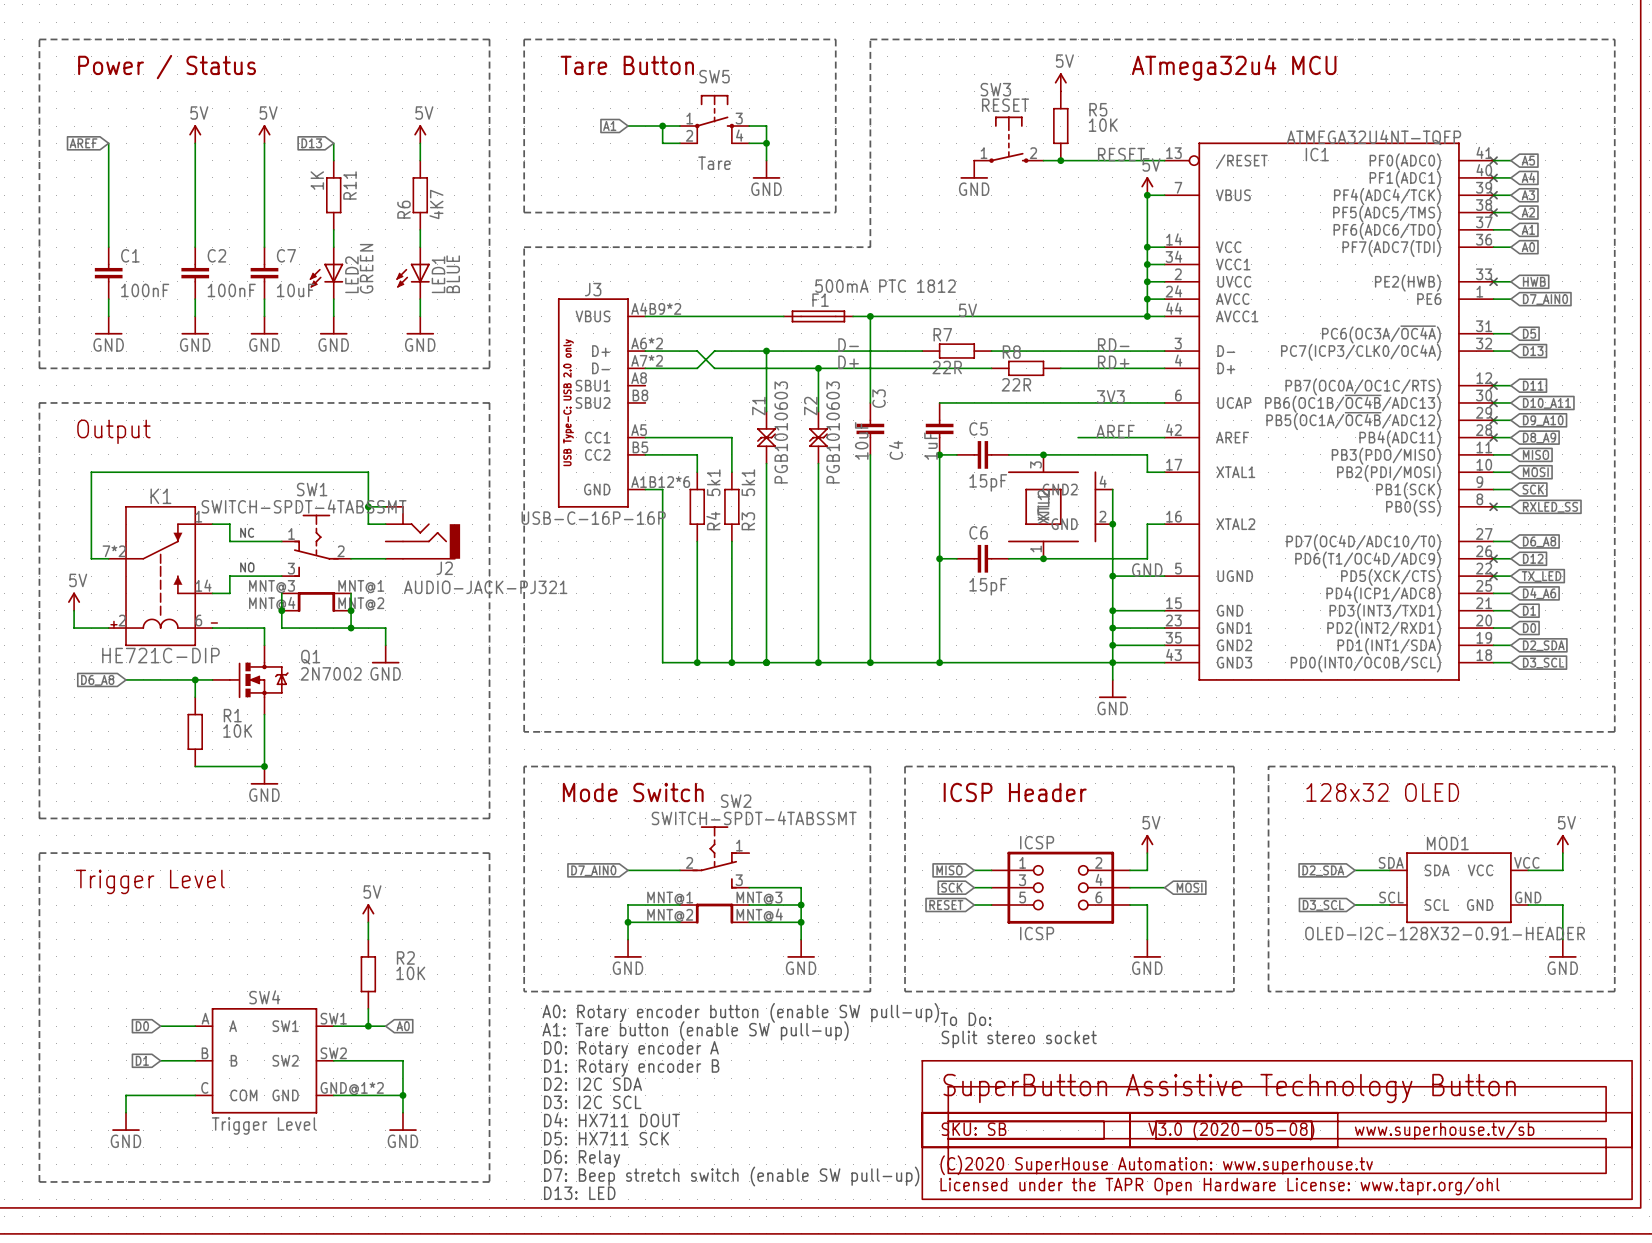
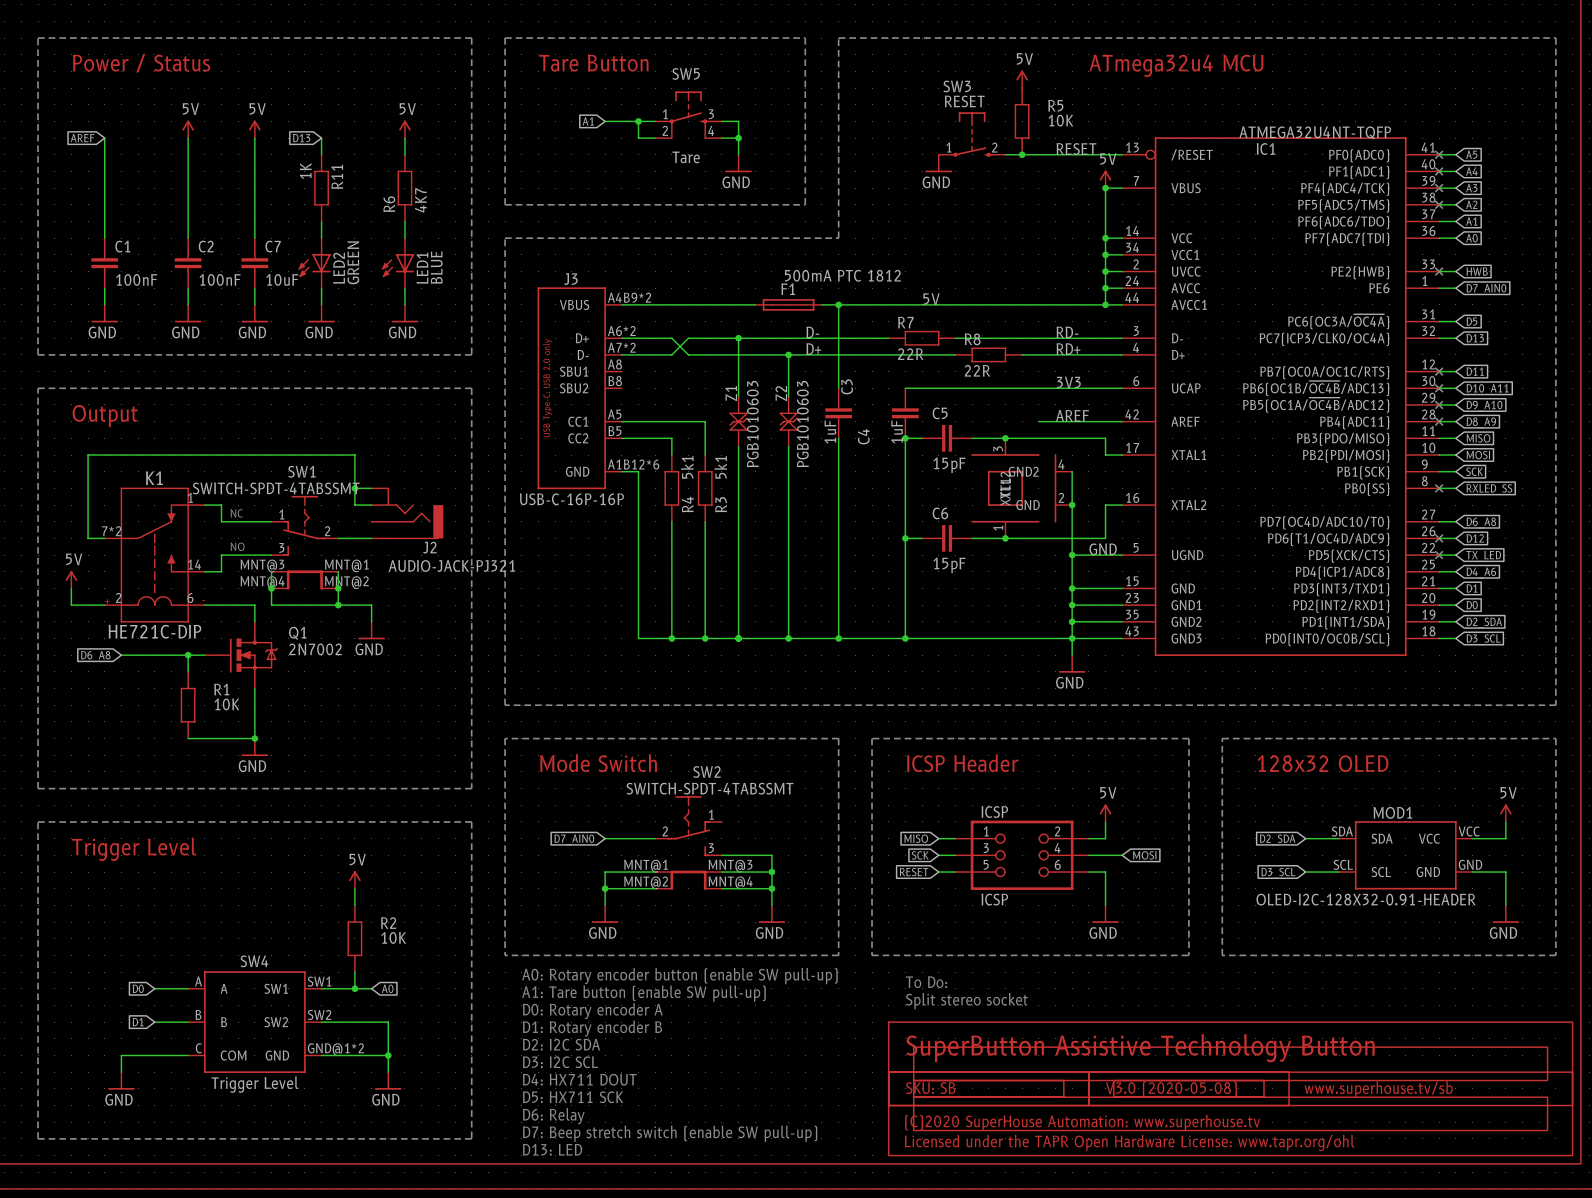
C3 value: 10uF (861, 440) -> 1uF (830, 432)

